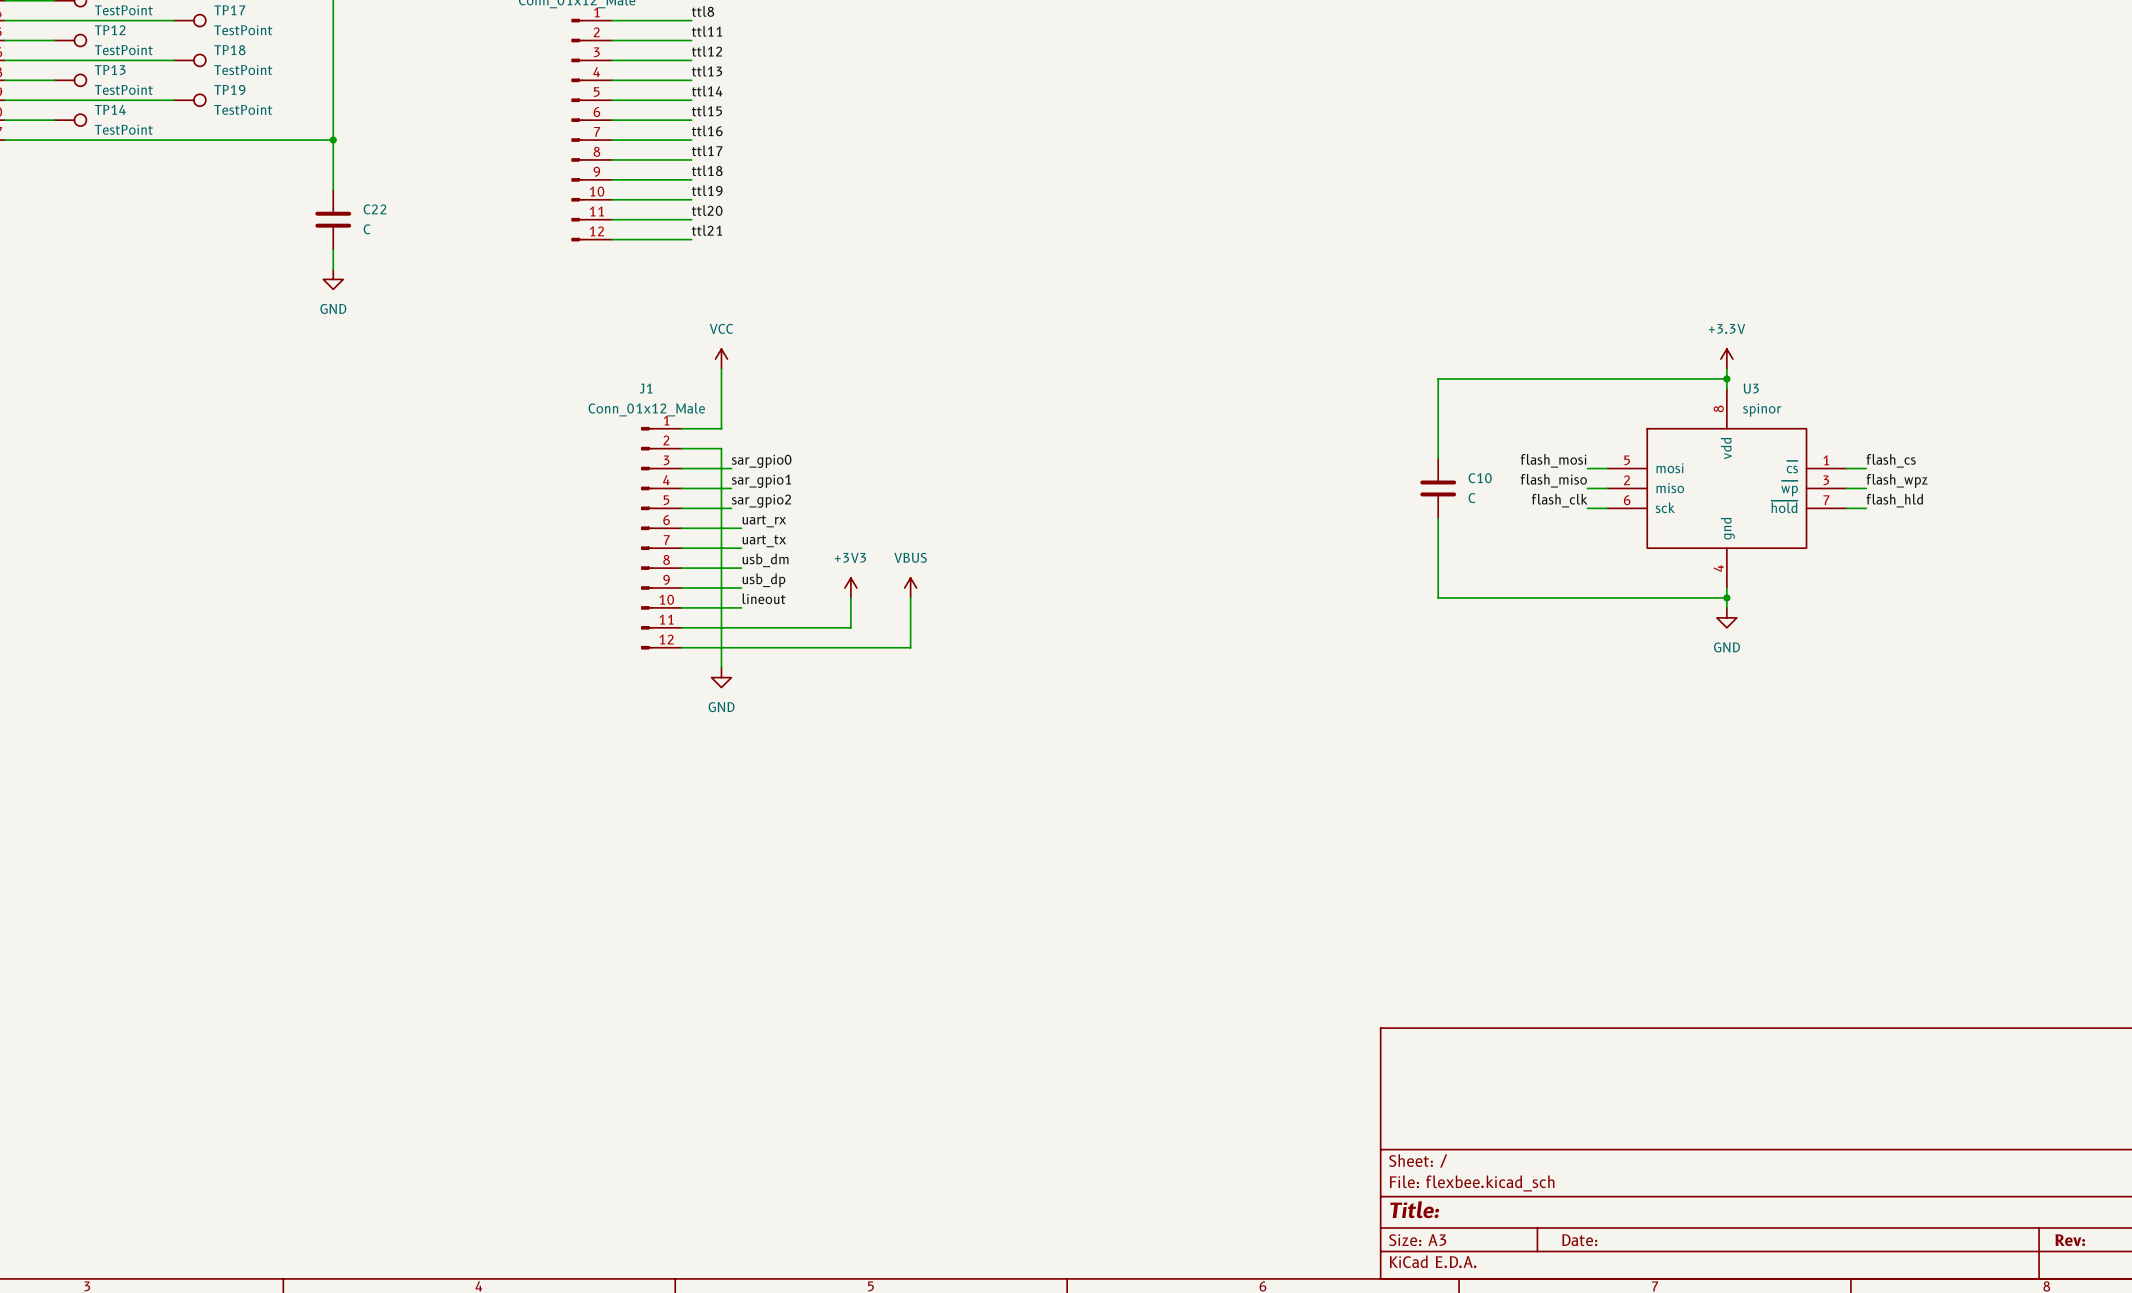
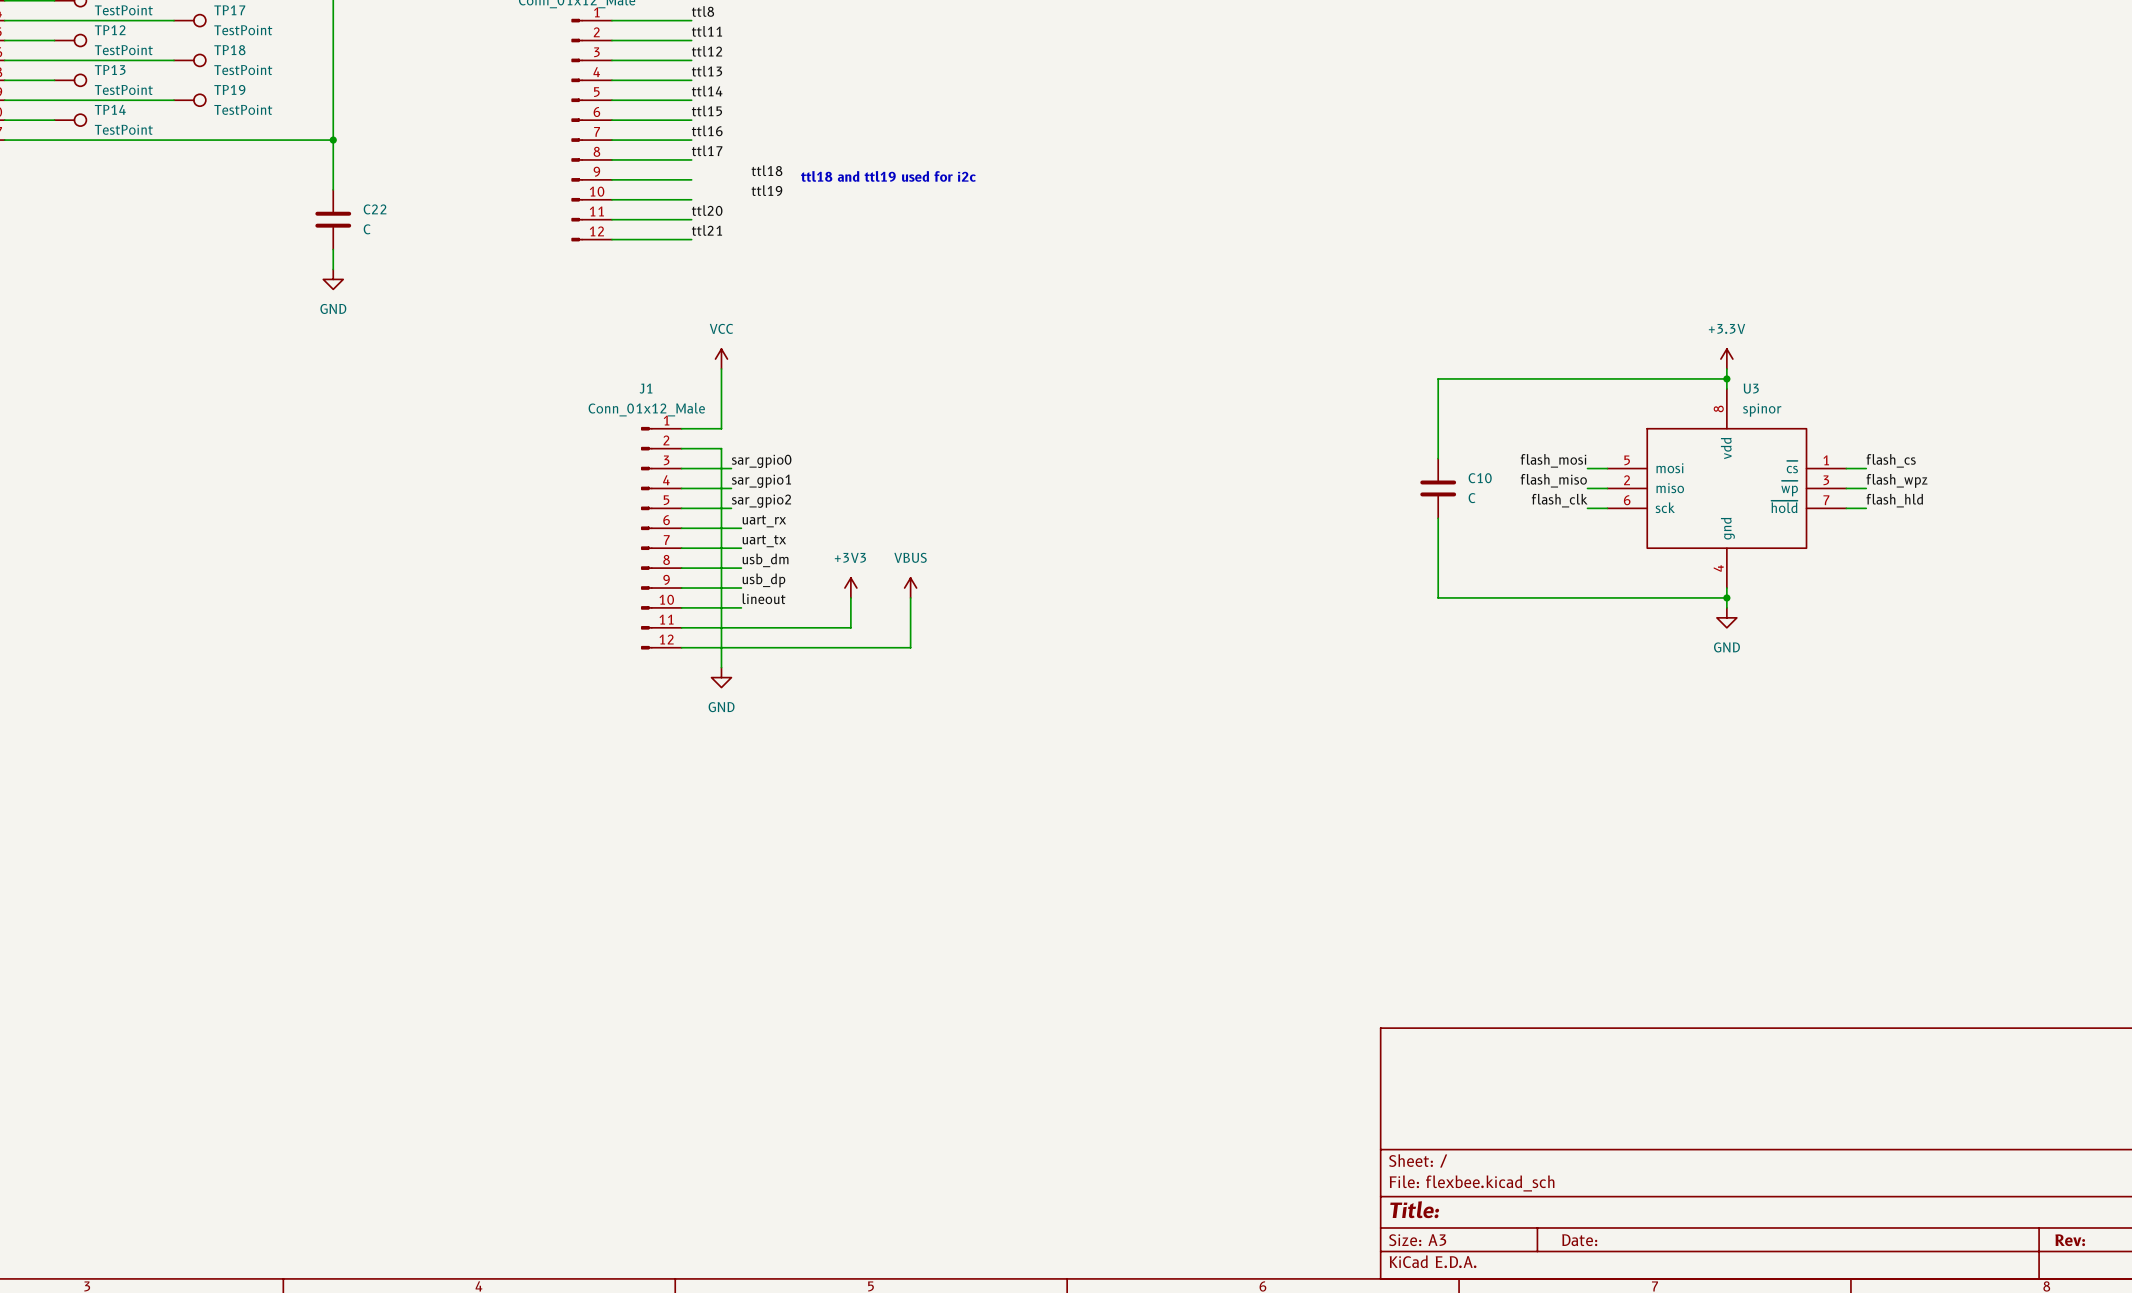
label position: ttl18 (707, 170) -> ttl18 (767, 170)
text: none -> ttl18 and ttl19 used for i2c (888, 176)
label position: ttl19 (707, 190) -> ttl19 (766, 190)

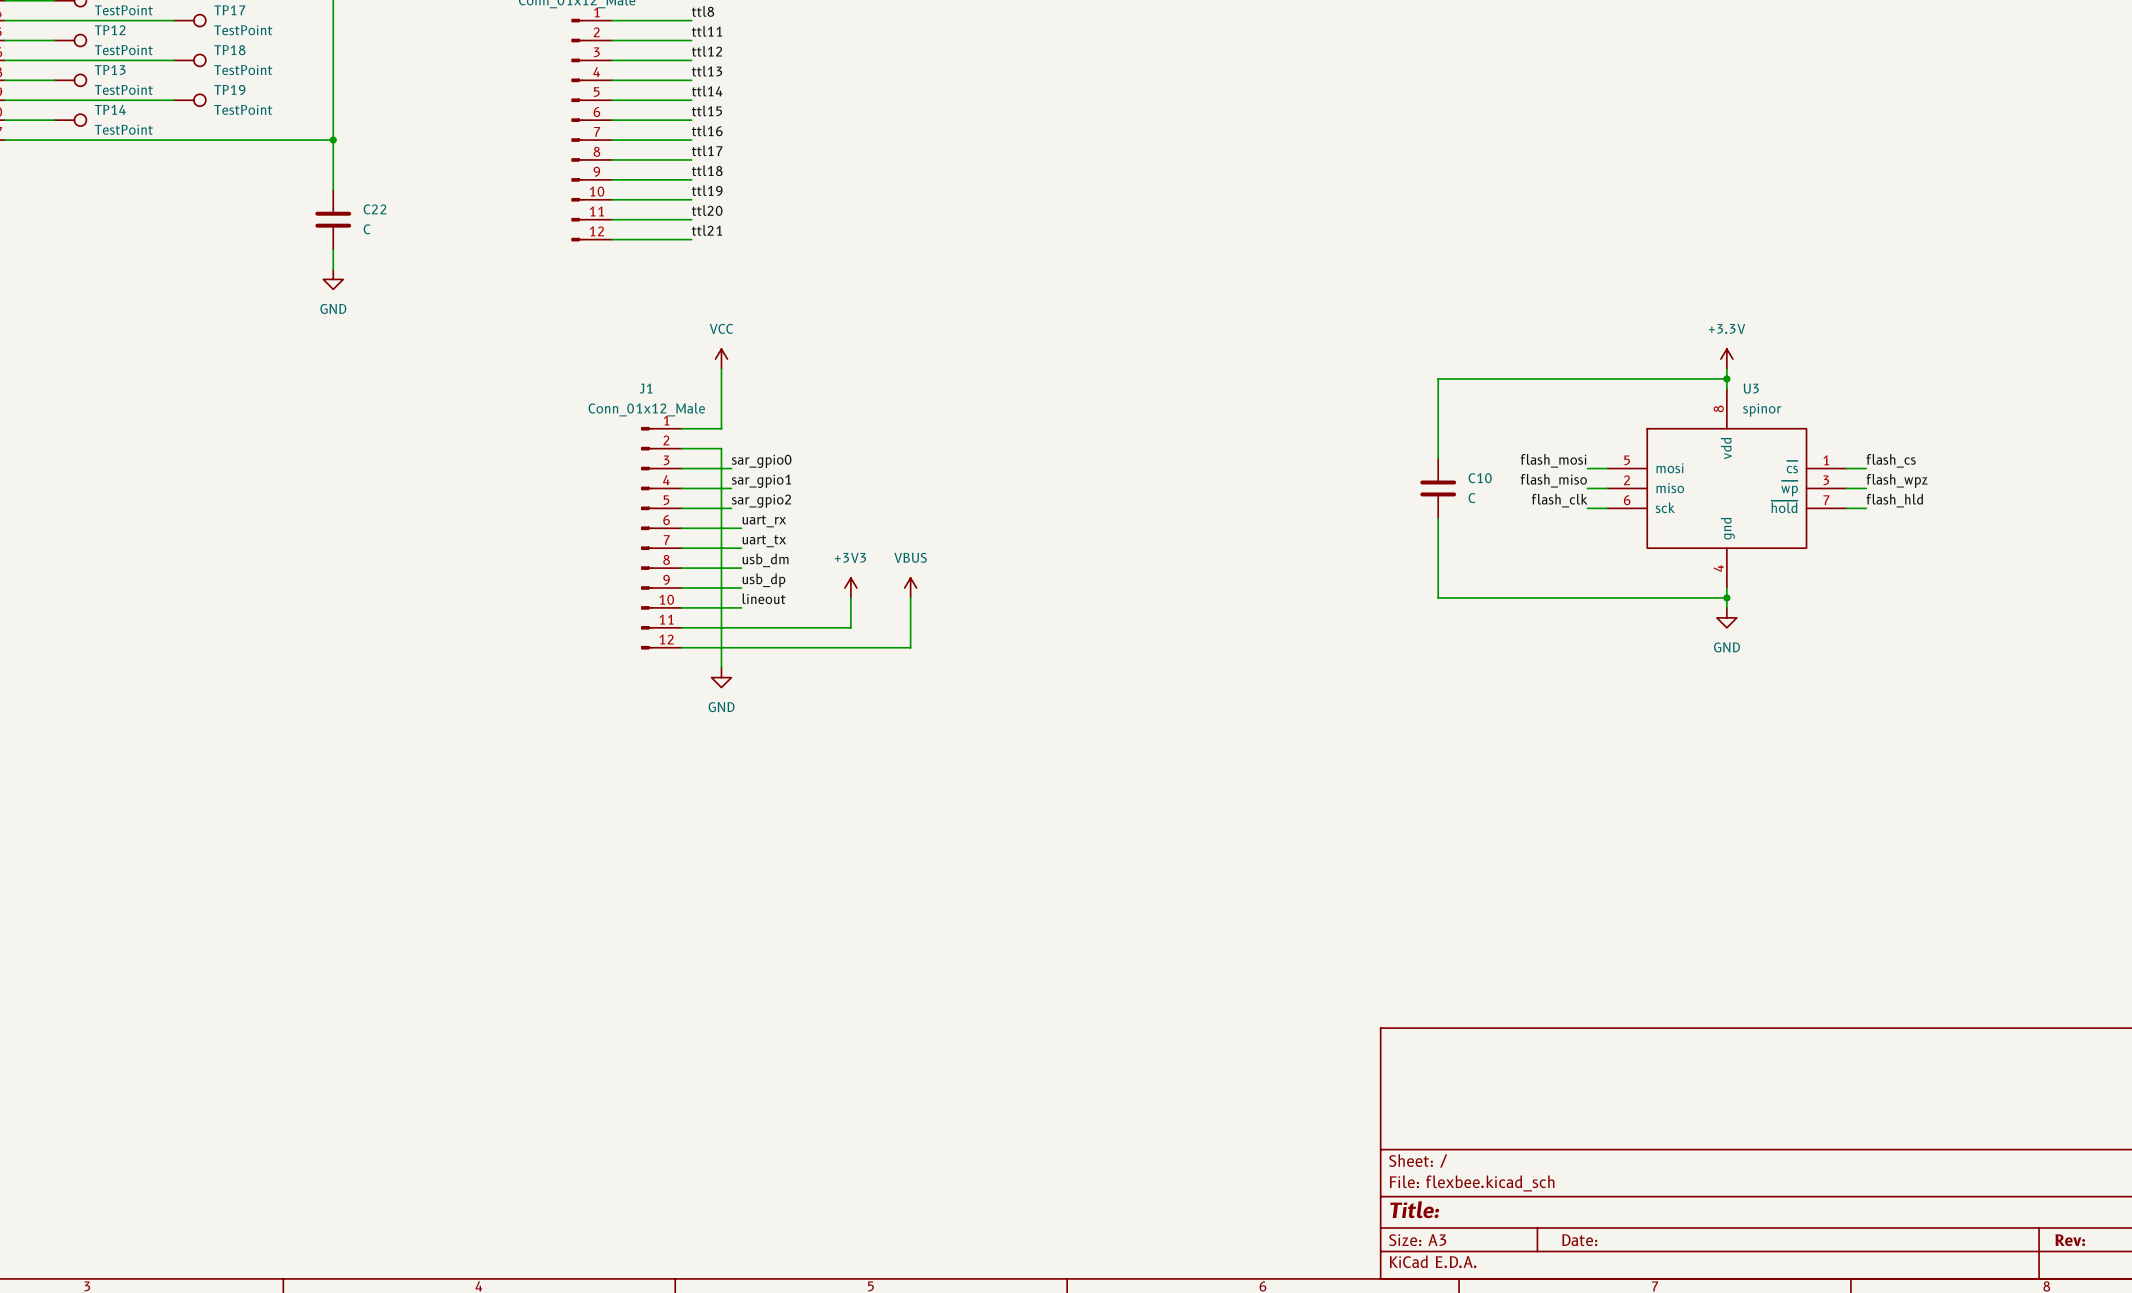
label position: ttl18 (767, 170) -> ttl18 (707, 170)
text: ttl18 and ttl19 used for i2c (888, 176) -> none
label position: ttl19 (766, 190) -> ttl19 (707, 190)

